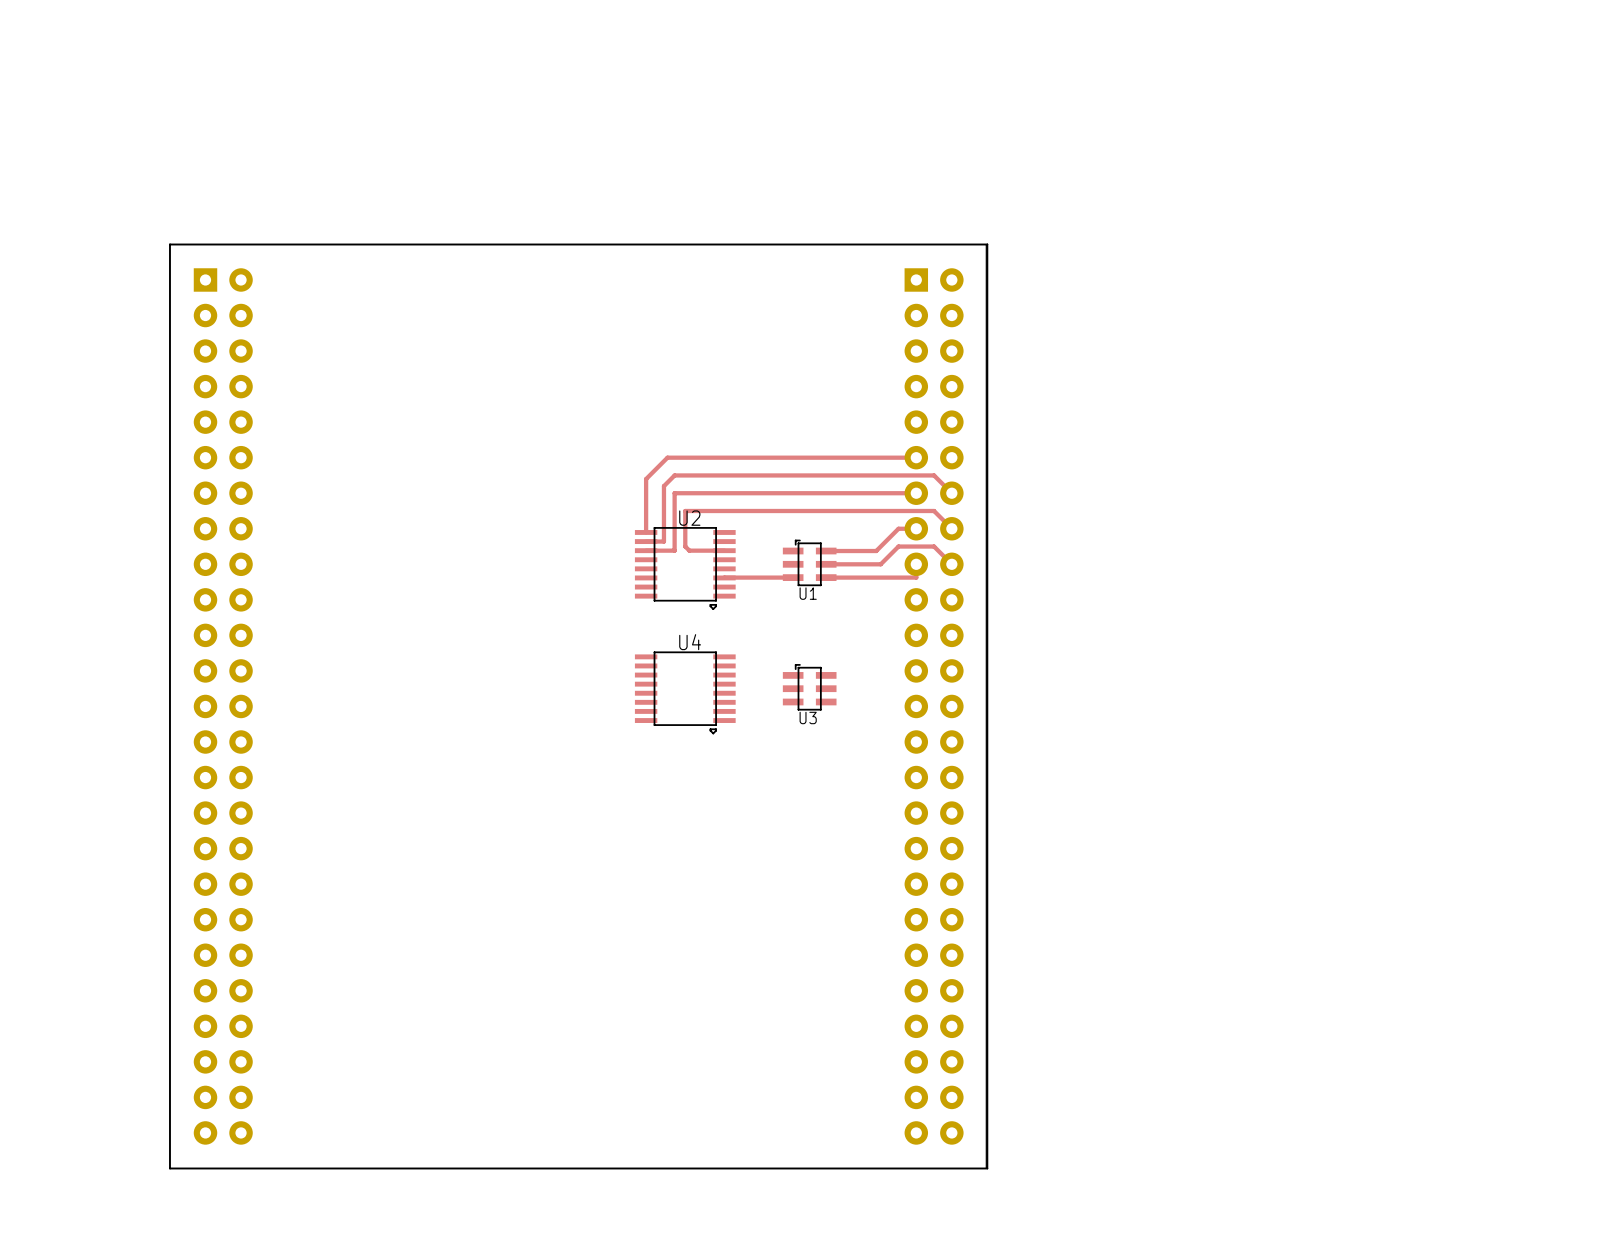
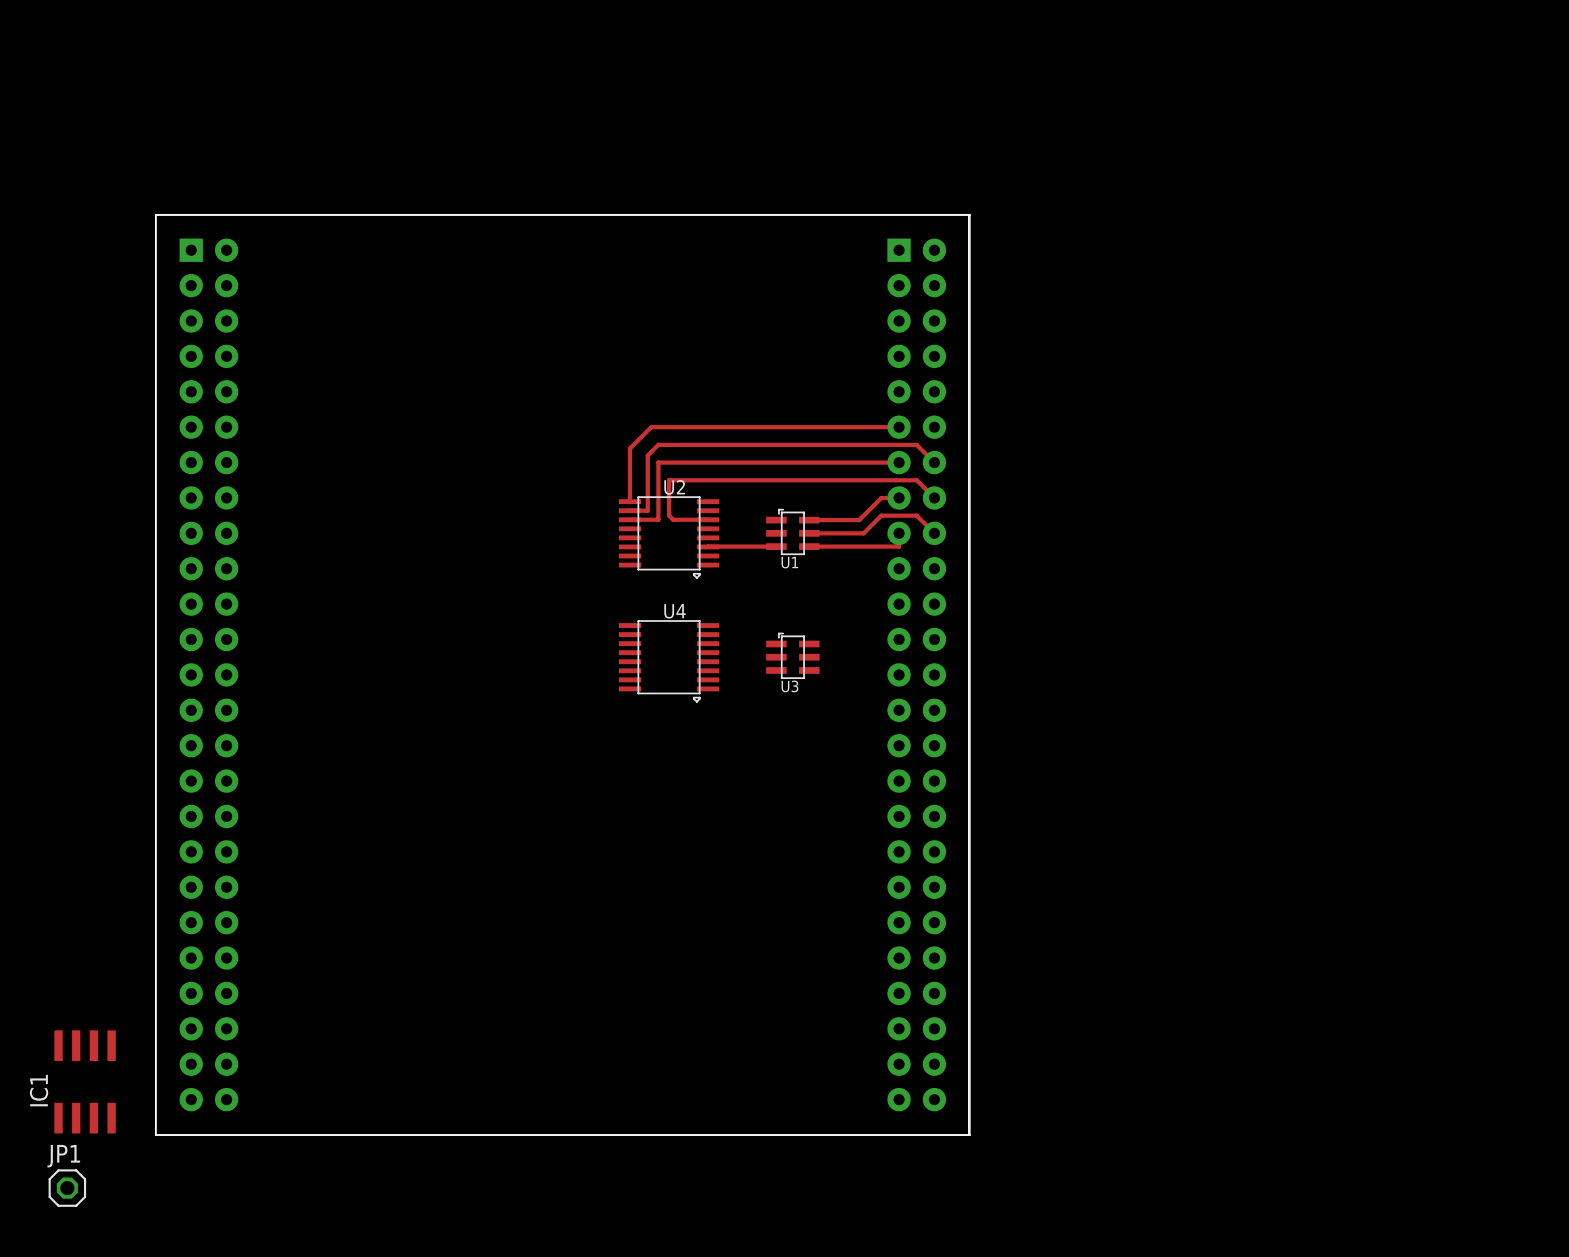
IC1: none -> (85, 1081)
JP1: none -> (67, 1188)

